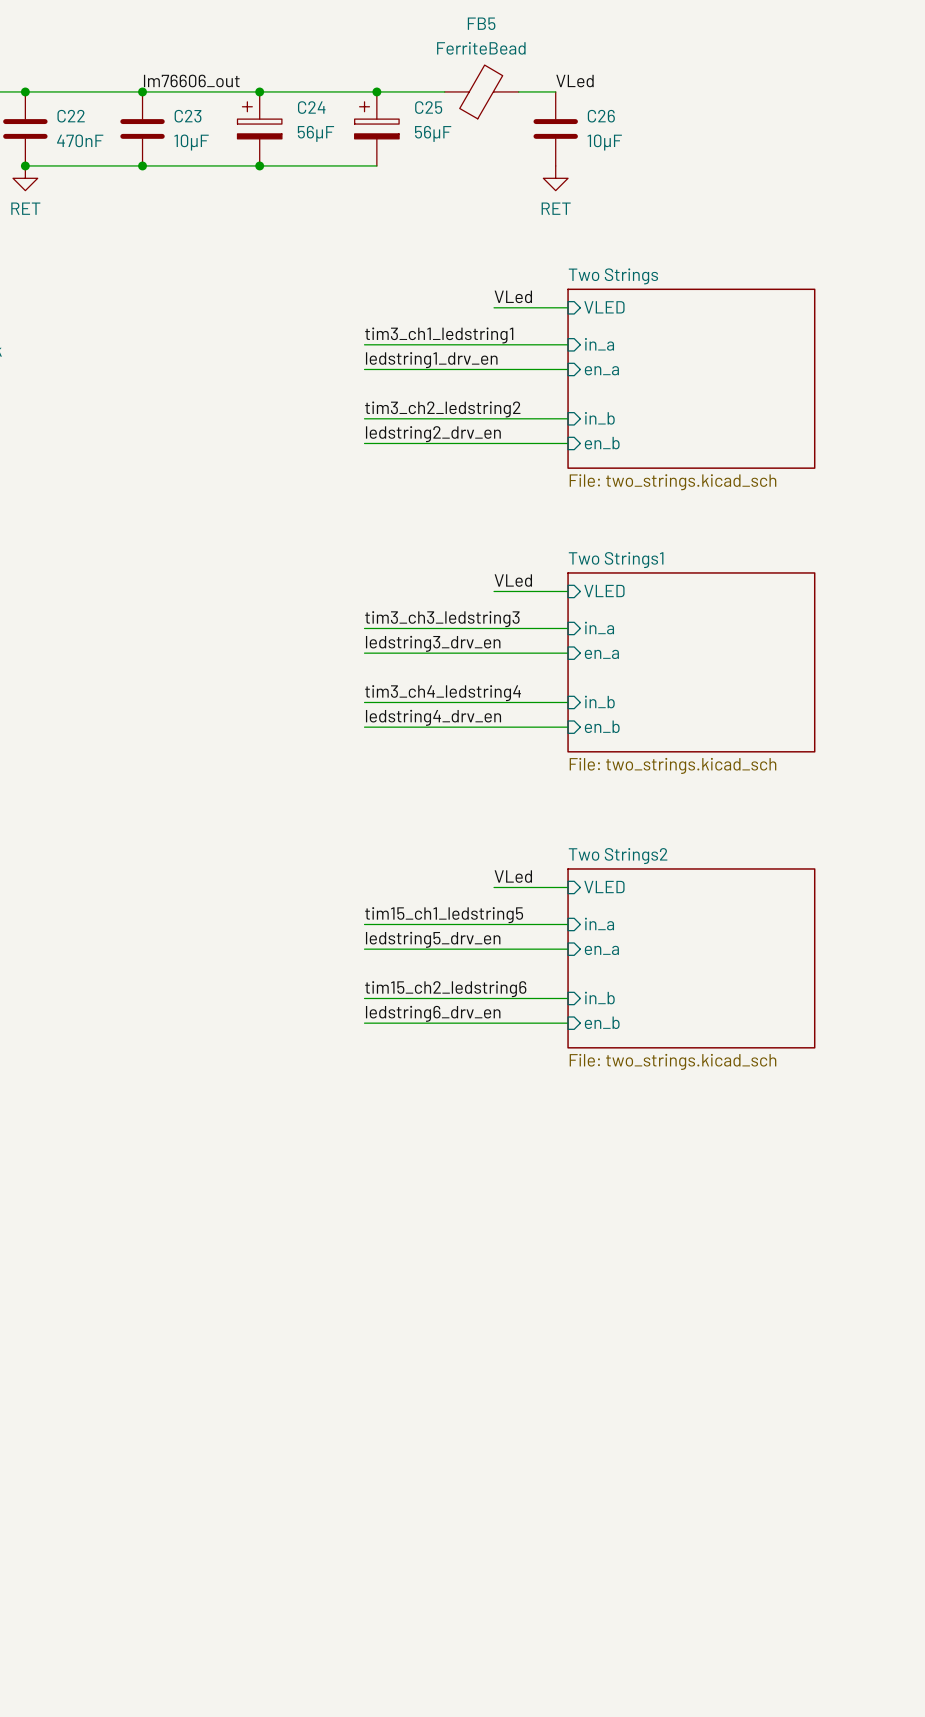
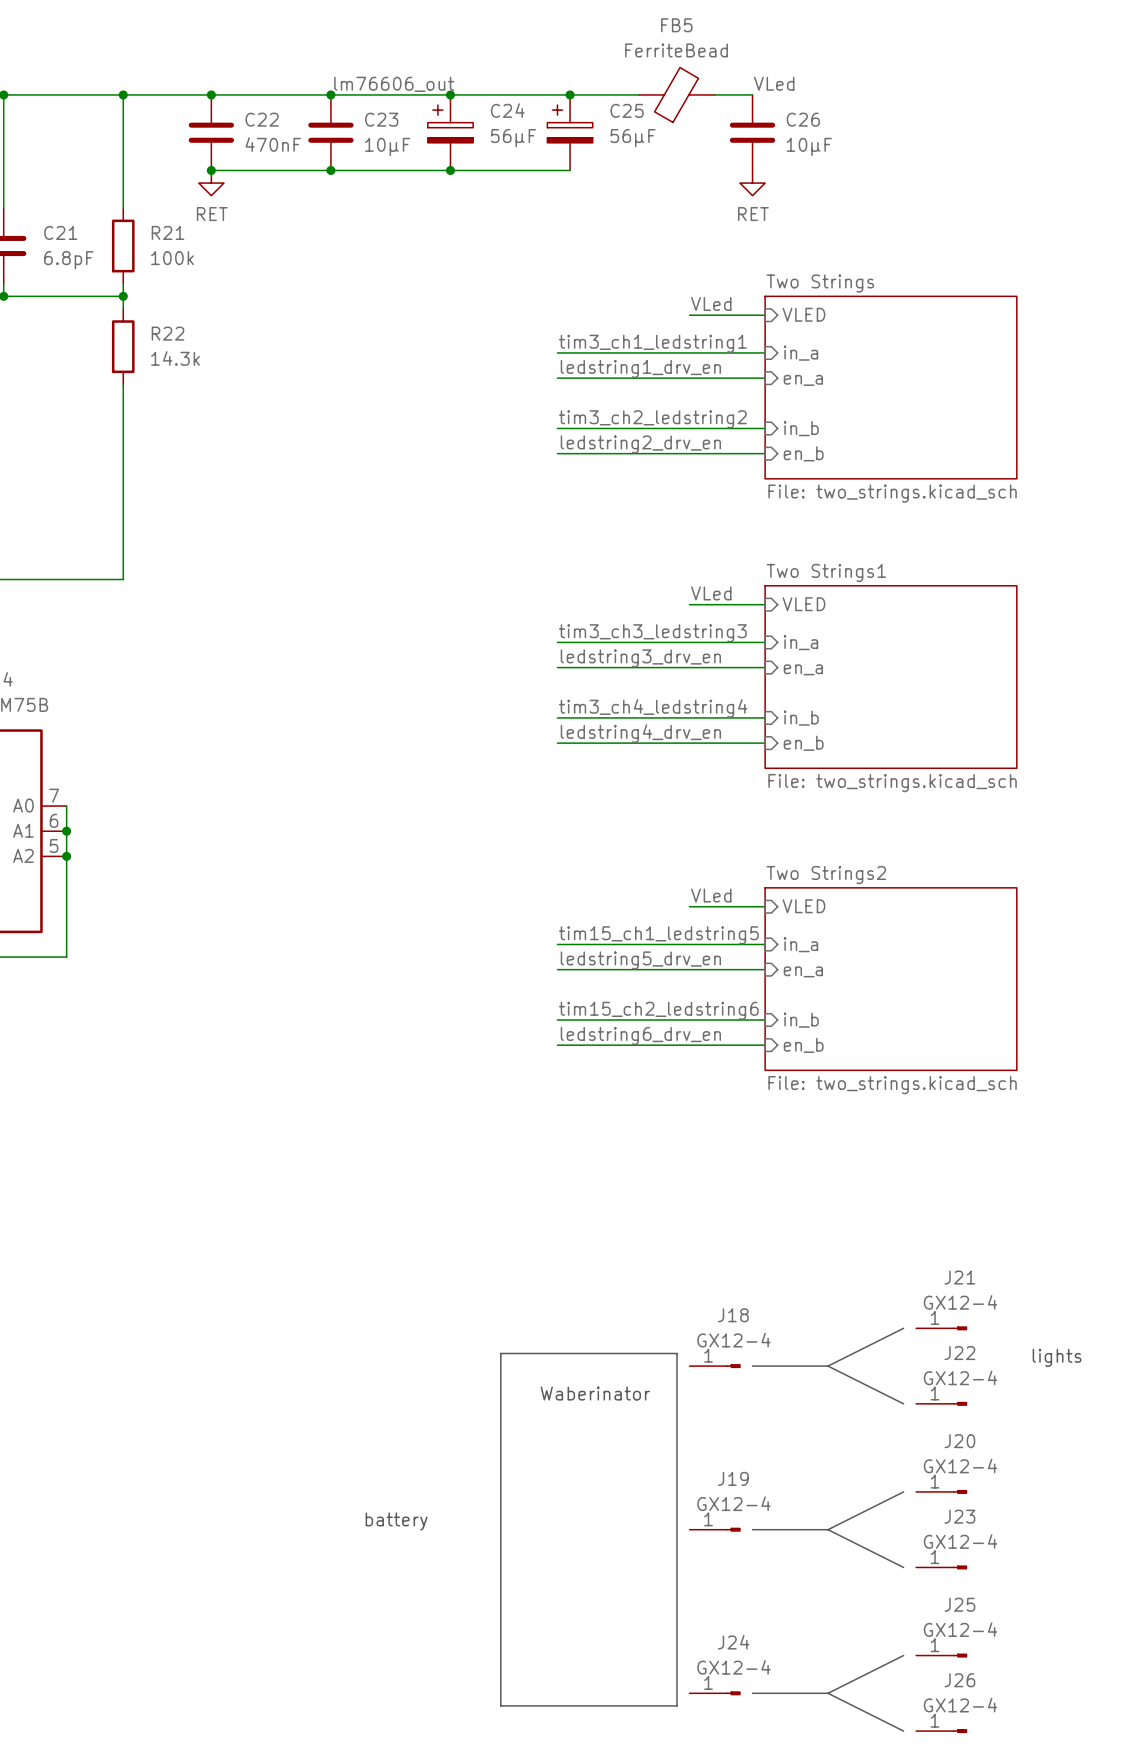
line: none -> (903, 1328) (828, 1366)
J21: none -> GX12-4 (941, 1328)
line: none -> (500, 1353) (677, 1353) (677, 1705) (500, 1705) (500, 1353)
text: none -> lights (1057, 1357)
J18: none -> GX12-4 (715, 1366)
line: none -> (752, 1366) (828, 1366)
line: none -> (828, 1366) (903, 1403)
text: none -> Waberinator (595, 1393)
J22: none -> GX12-4 (941, 1403)
line: none -> (903, 1491) (828, 1529)
J20: none -> GX12-4 (941, 1491)
text: none -> battery (396, 1521)
J19: none -> GX12-4 (715, 1529)
line: none -> (752, 1529) (828, 1529)
line: none -> (828, 1529) (903, 1567)
J23: none -> GX12-4 (941, 1567)
line: none -> (903, 1655) (828, 1693)
J25: none -> GX12-4 (941, 1655)
J24: none -> GX12-4 (715, 1693)
line: none -> (752, 1693) (828, 1693)
line: none -> (828, 1693) (903, 1731)
J26: none -> GX12-4 (941, 1731)

